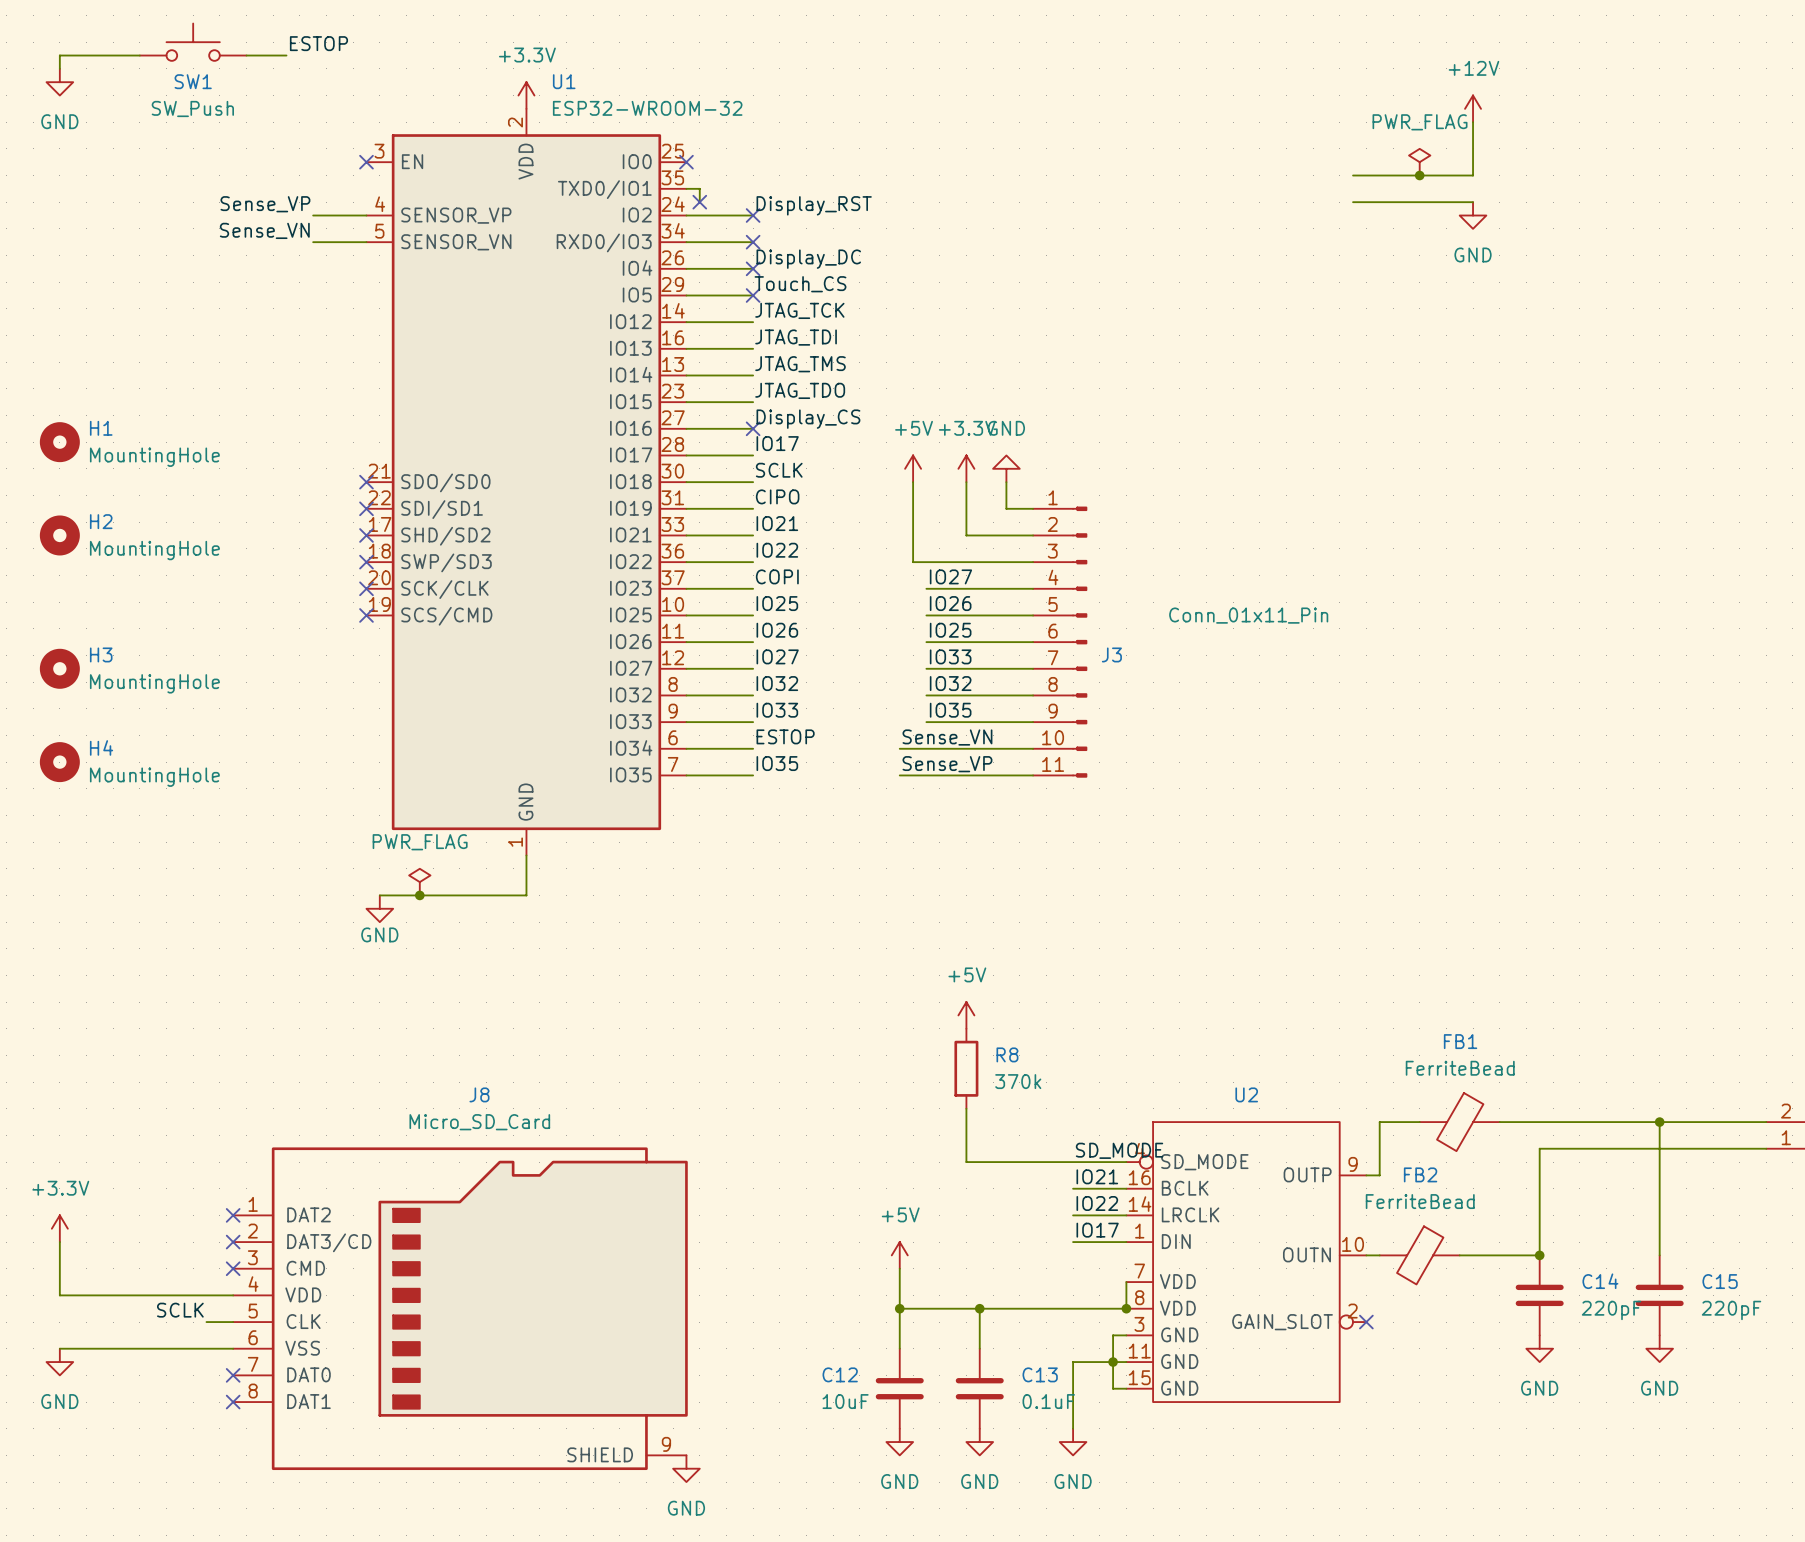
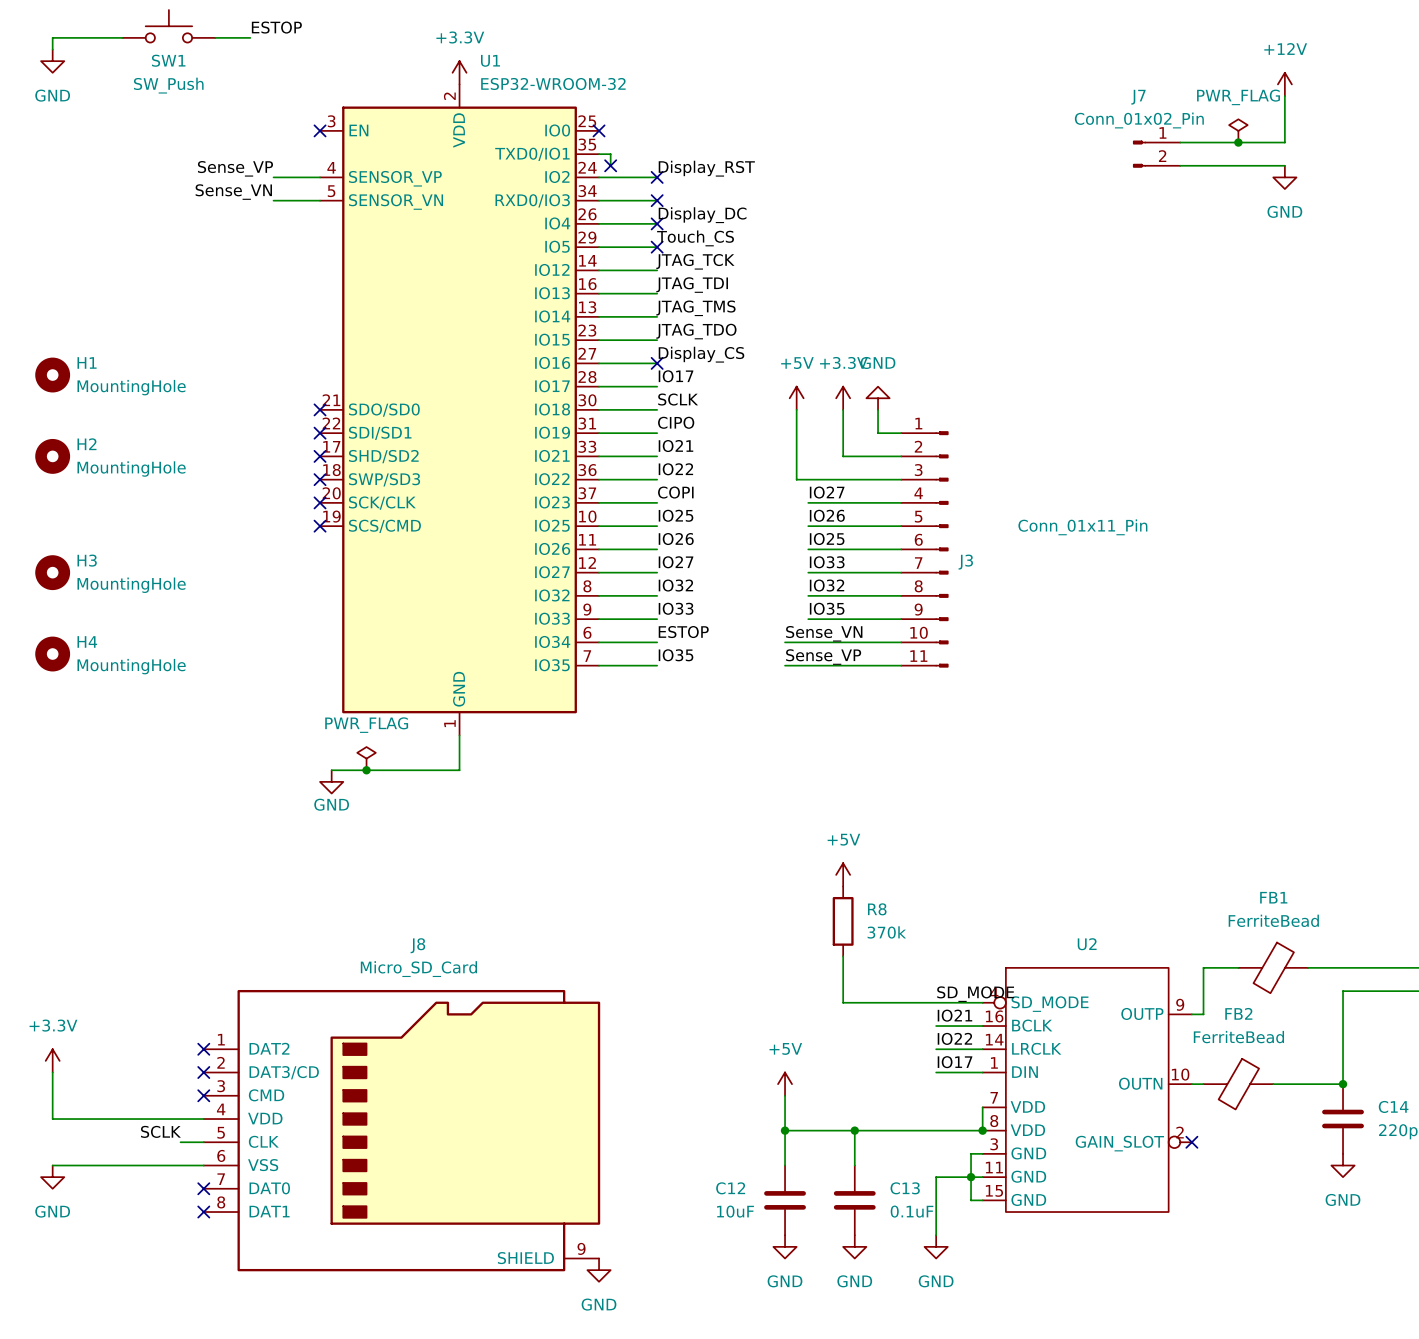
J7: none -> Conn_01x02_Pin (1156, 154)

